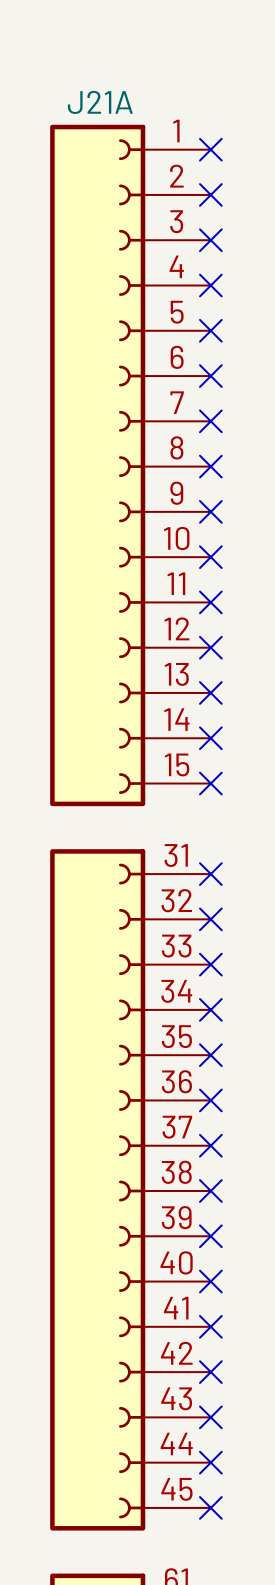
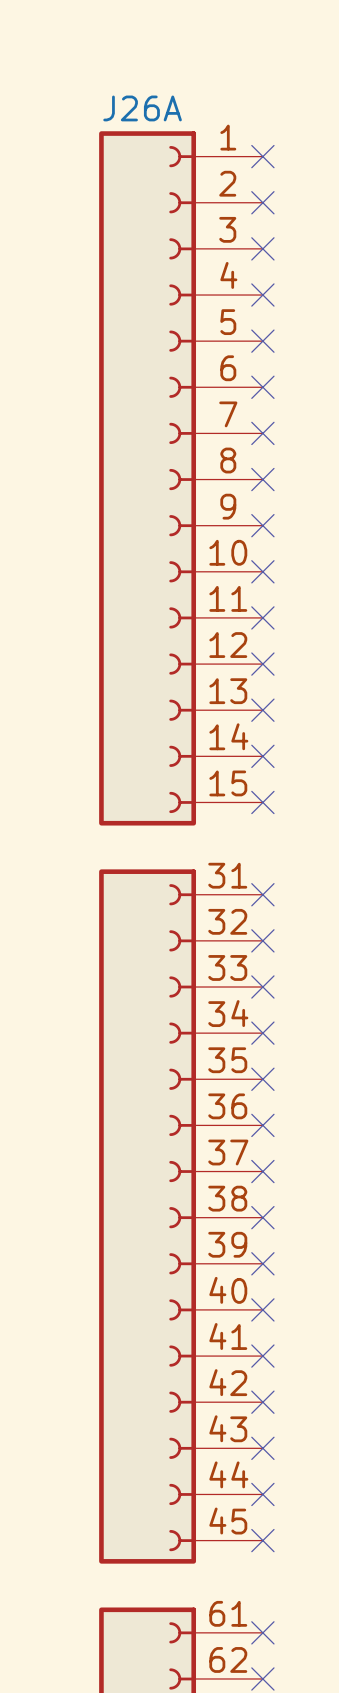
J21A name: J21A (100, 102) -> J26A (142, 108)

